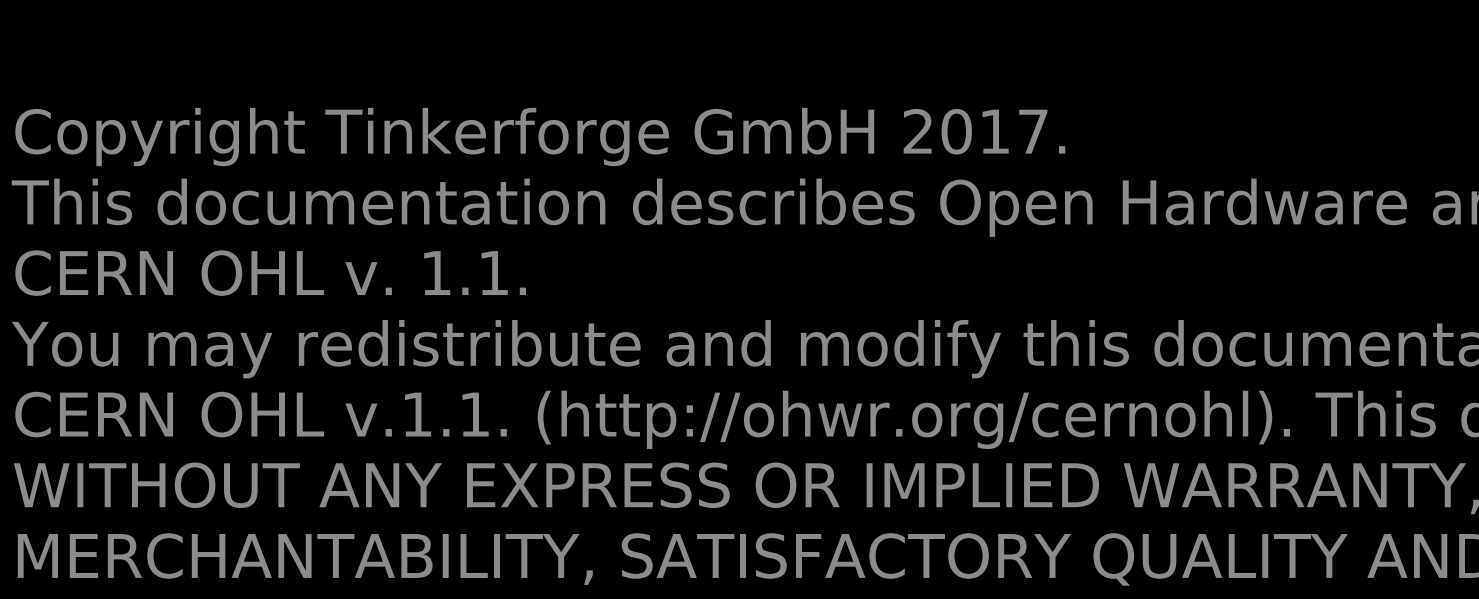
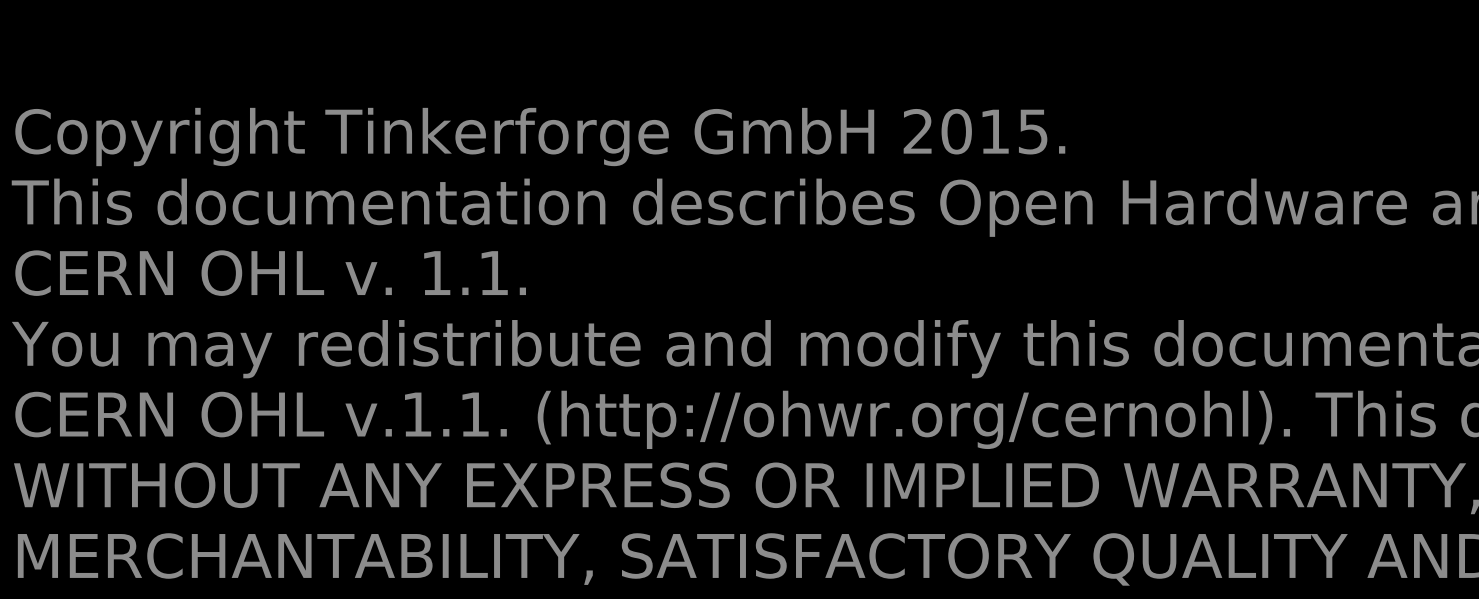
text: Copyright Tinkerforge GmbH 2017. (540, 137) -> Copyright Tinkerforge GmbH 2015. (540, 137)

